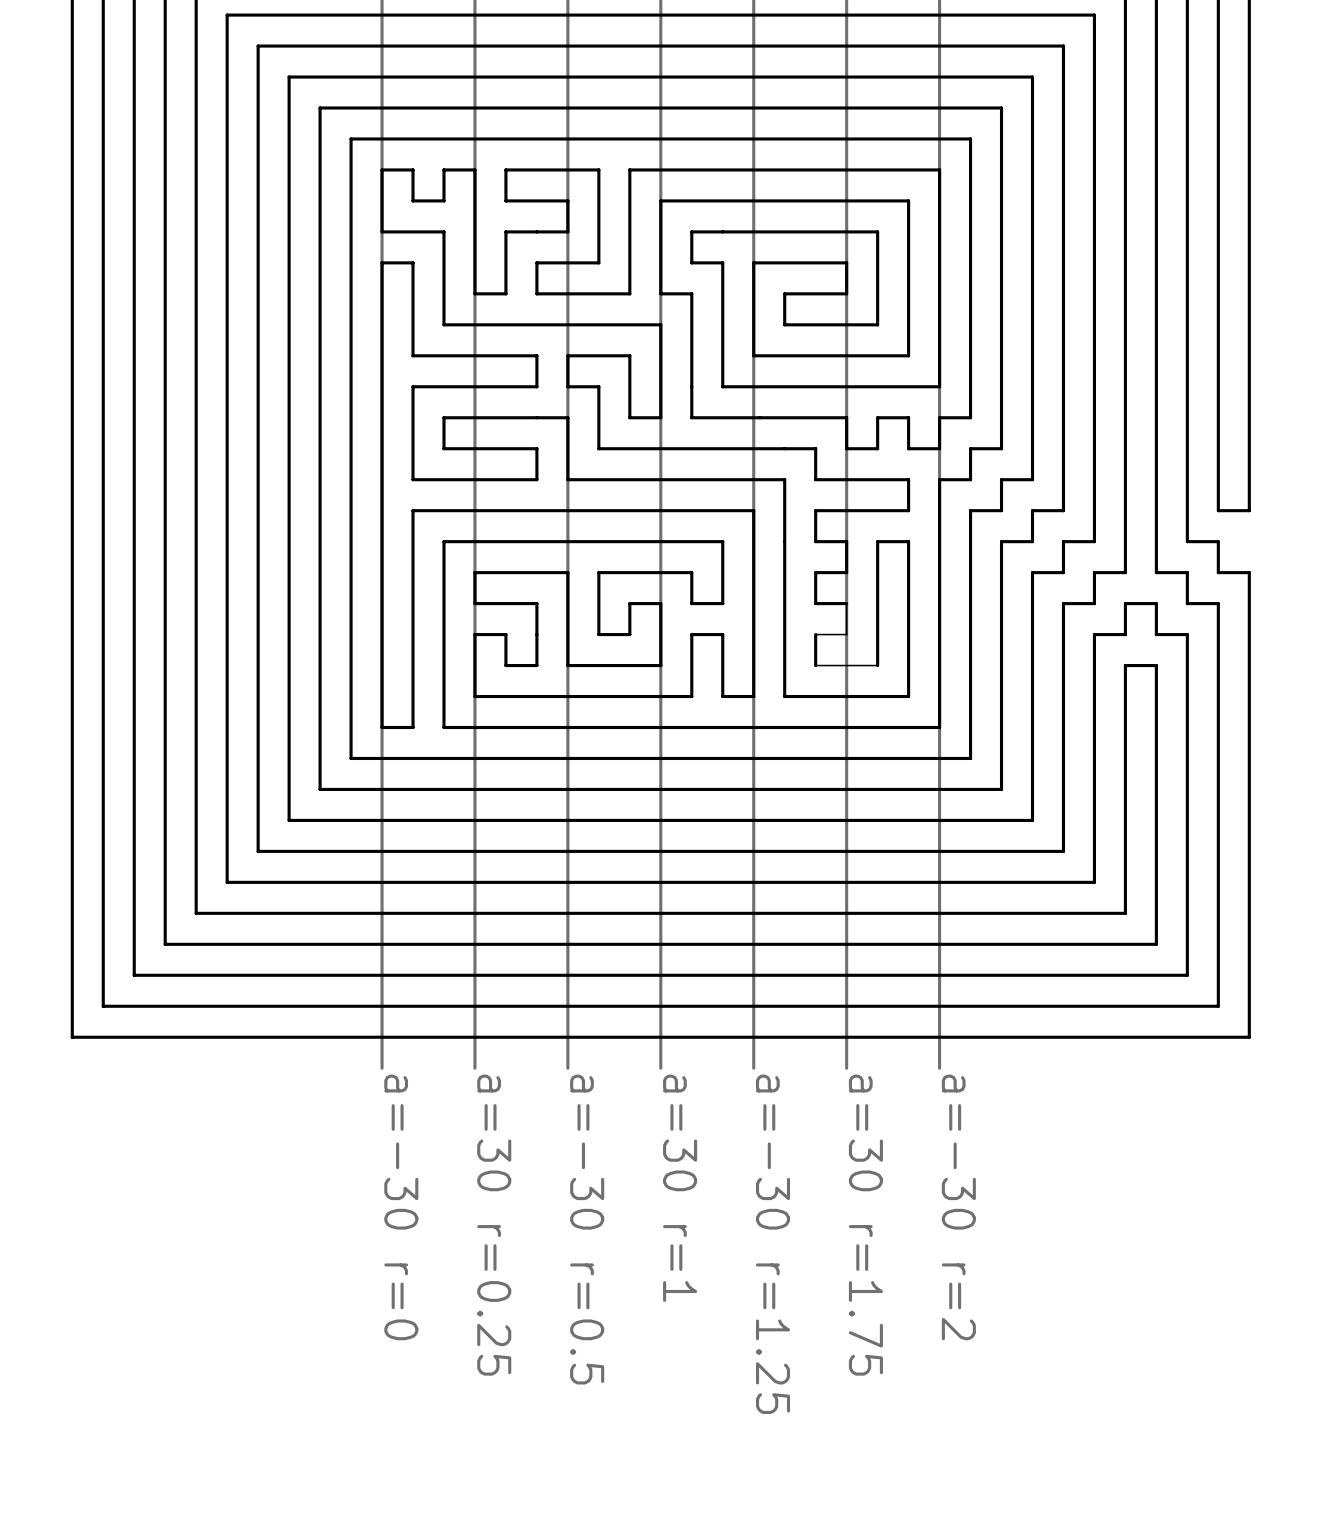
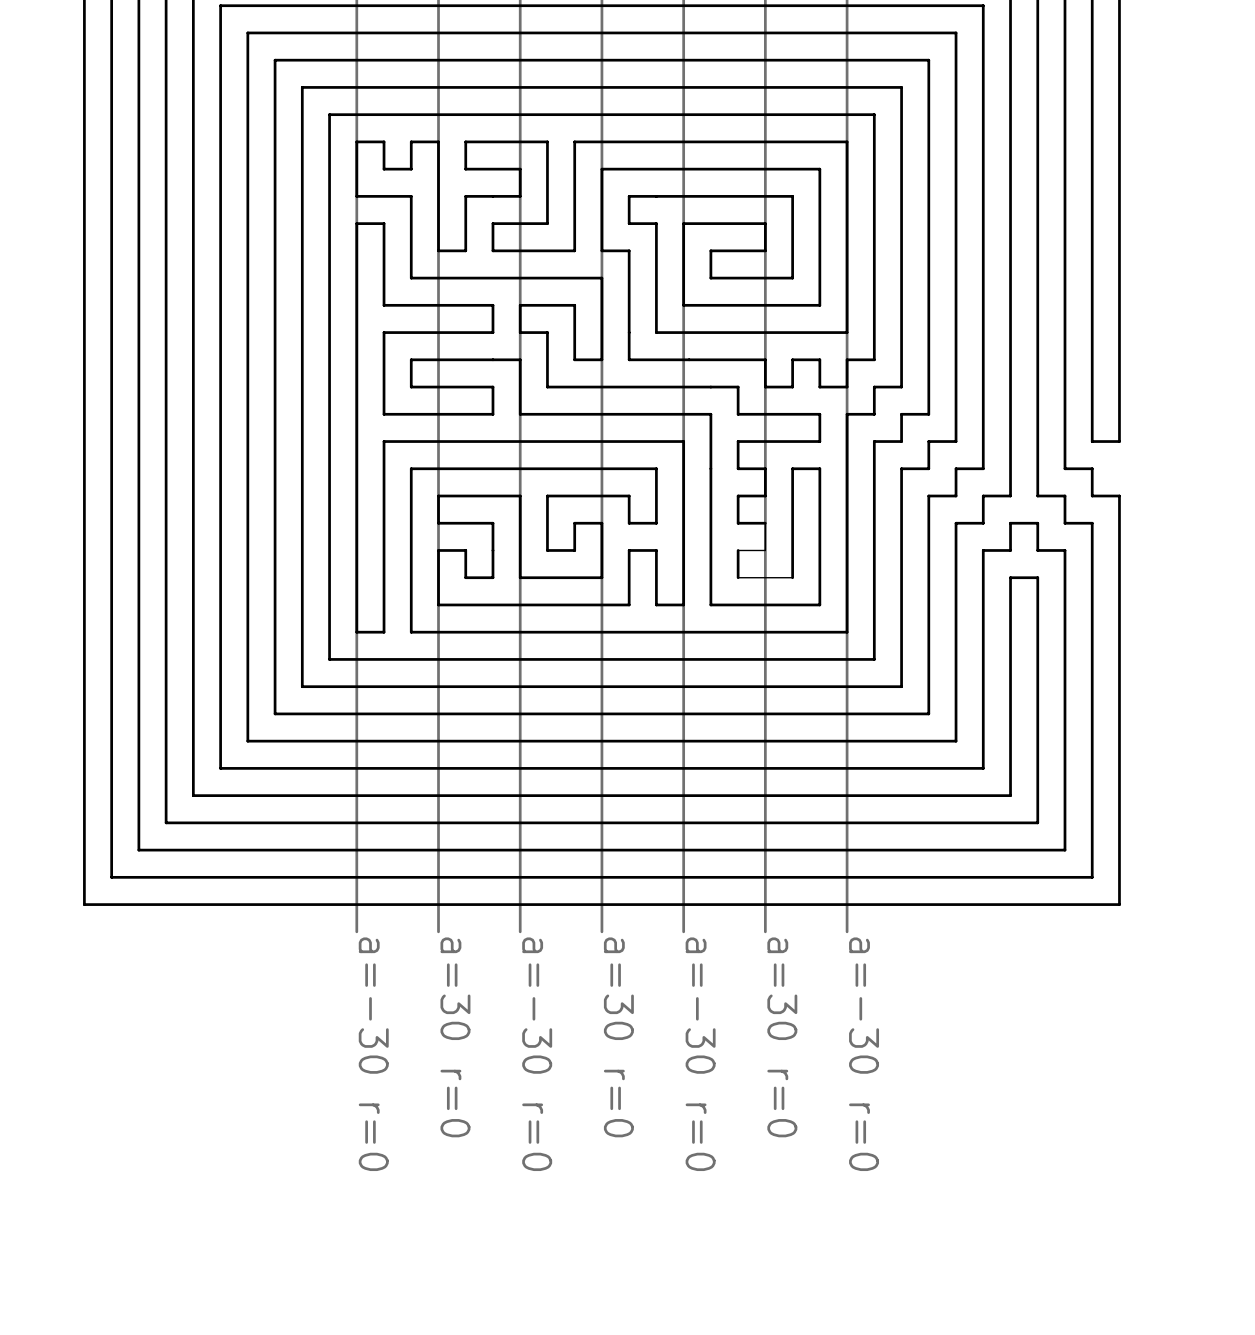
text: a=30 r=1 (680, 1188) -> a=30 r=0 (618, 1037)
text: a=-30 r=2 (958, 1207) -> a=-30 r=0 (864, 1054)
text: a=30 r=0.25 (494, 1225) -> a=30 r=0 (455, 1037)
text: a=30 r=1.75 (865, 1225) -> a=30 r=0 (782, 1037)
text: a=-30 r=0.5 (587, 1229) -> a=-30 r=0 (537, 1054)
text: a=-30 r=1.25 (773, 1244) -> a=-30 r=0 (700, 1054)

